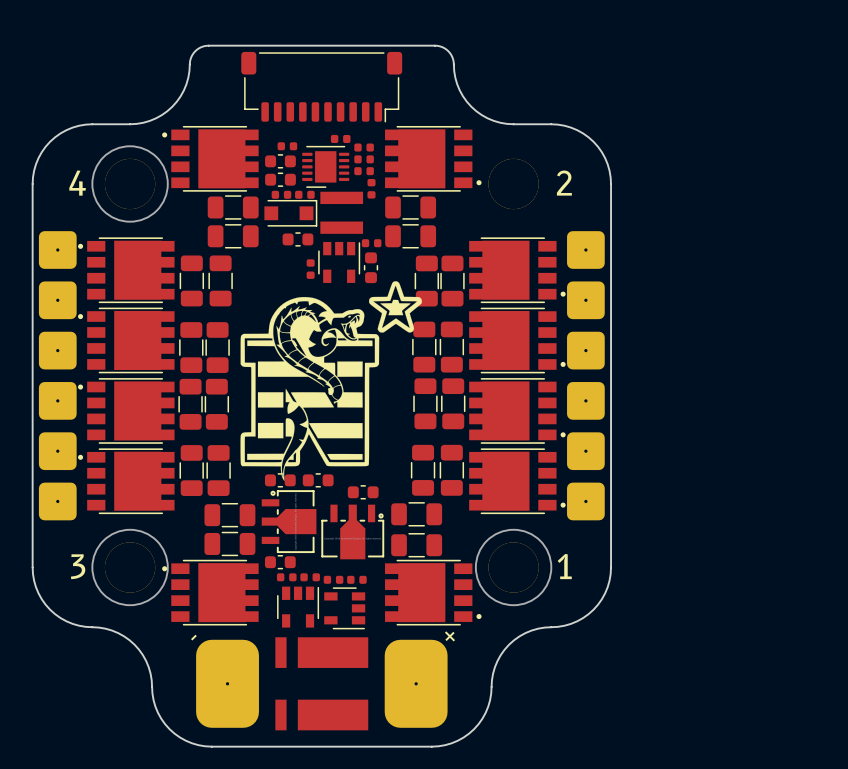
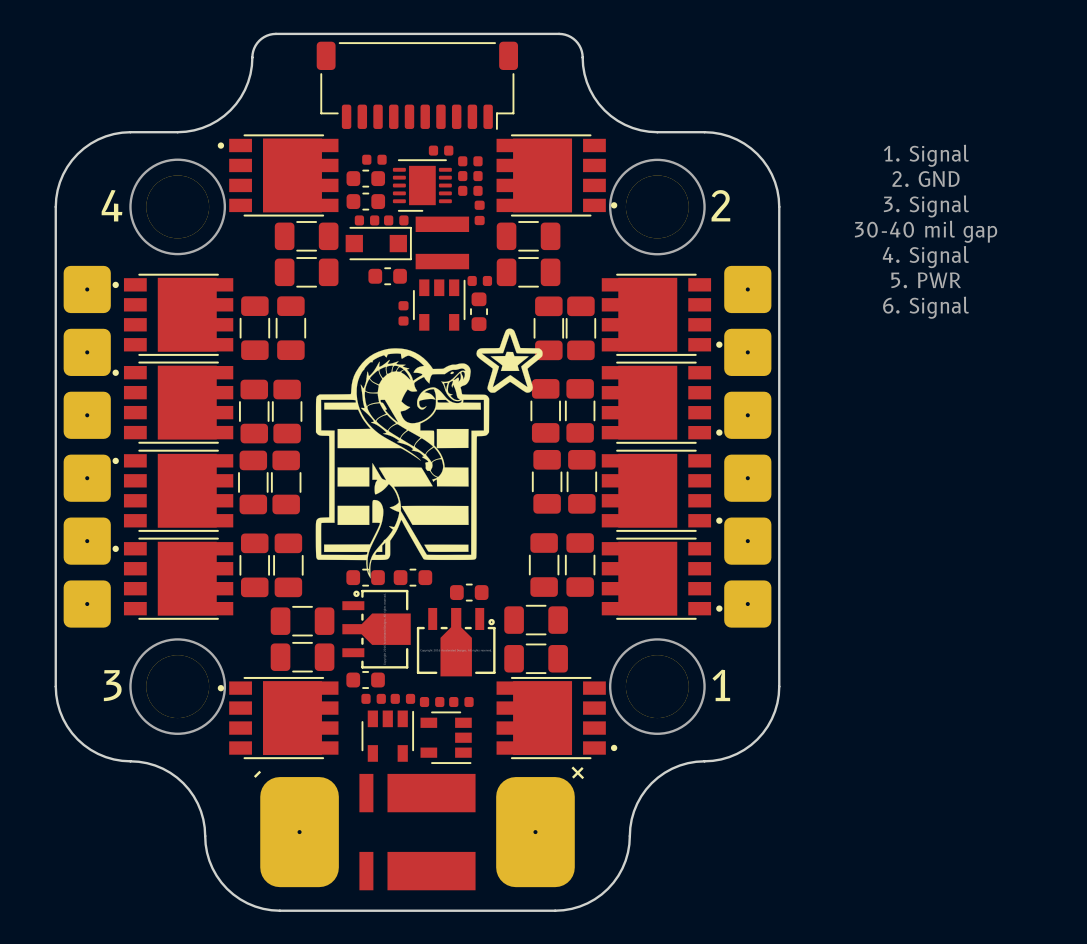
text: none -> 1. Signal (926, 155)
drawing: none -> [609, 158, 706, 256]
text: none -> 2. GND (926, 179)
text: none -> 3. Signal (926, 206)
text: none -> 30-40 mil gap (926, 231)
text: none -> 4. Signal (925, 257)
text: none -> 5. PWR (926, 280)
text: none -> 6. Signal (926, 307)

